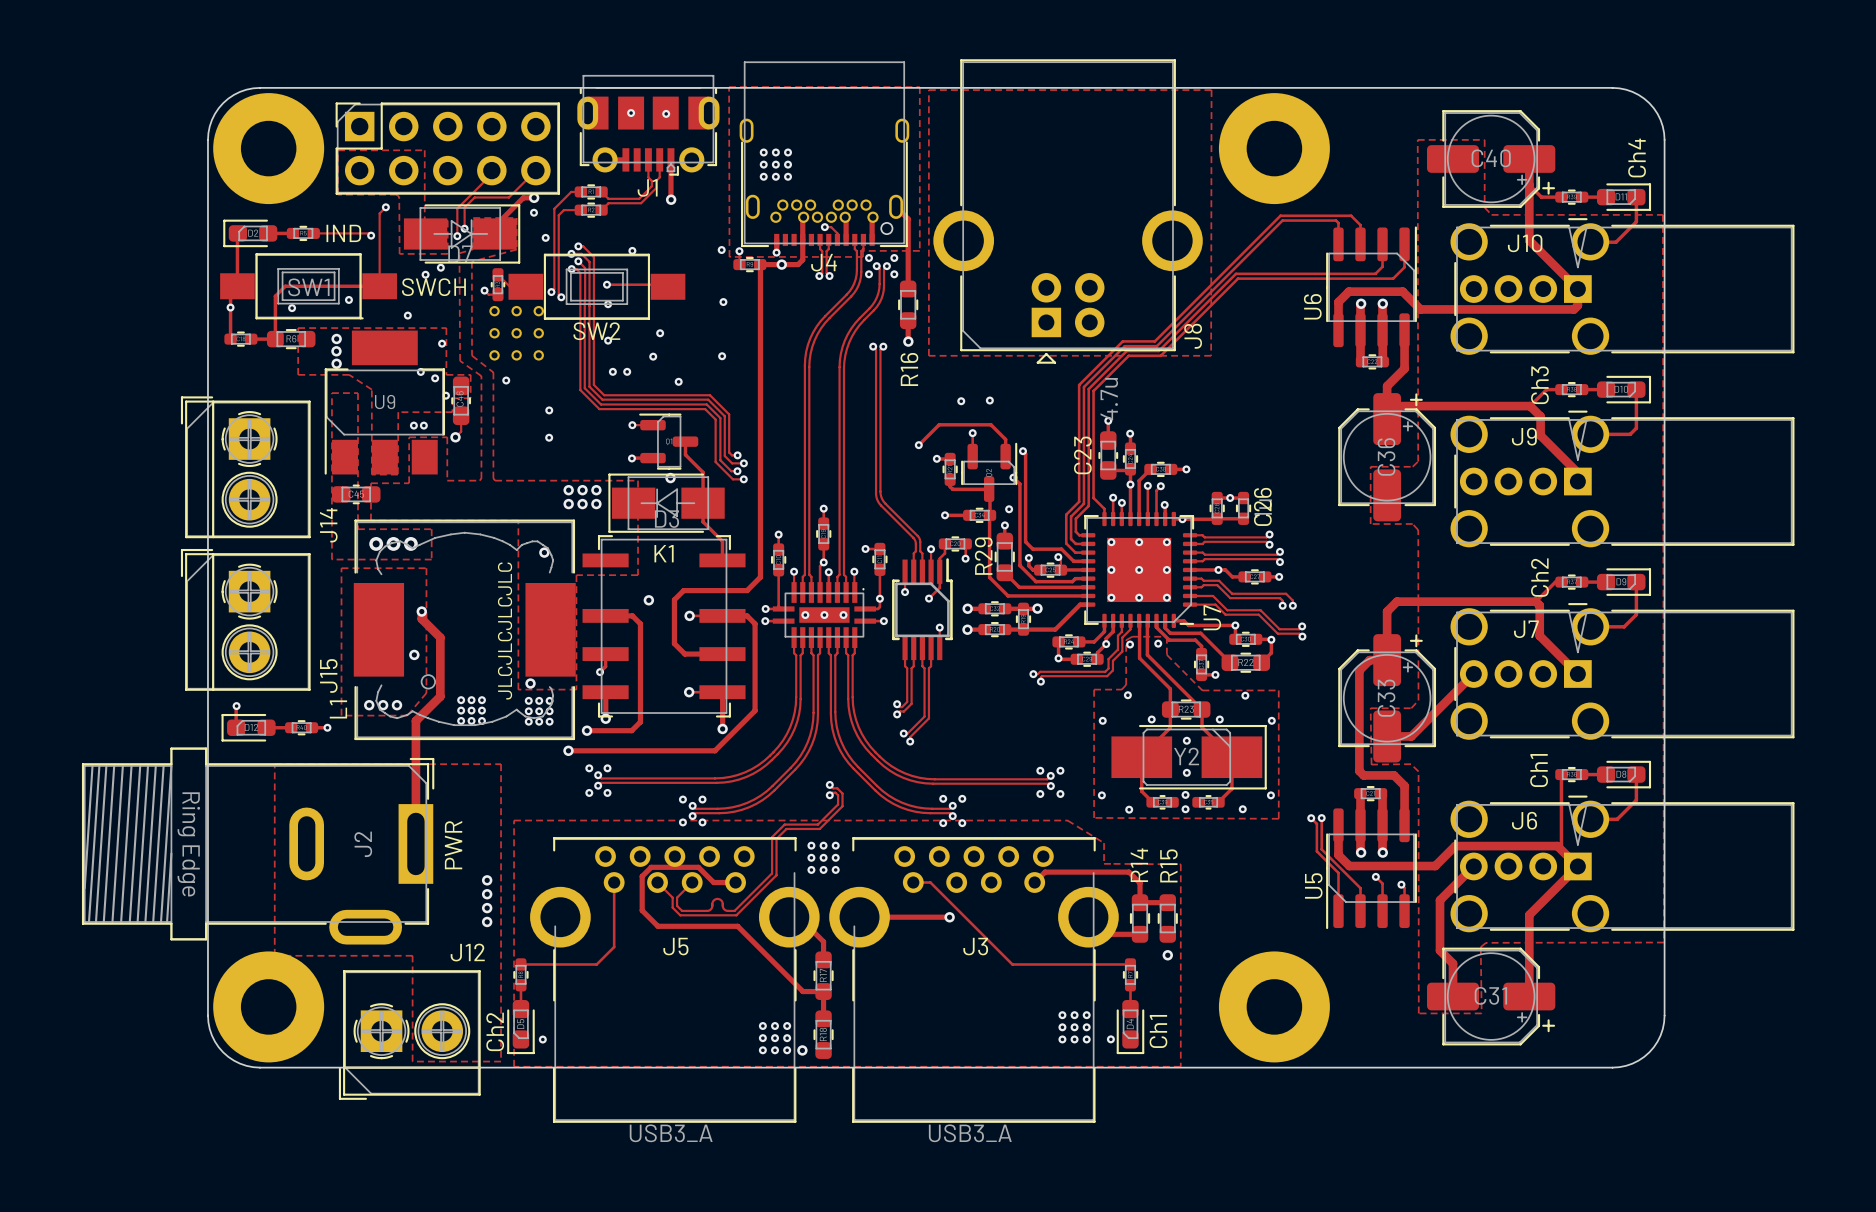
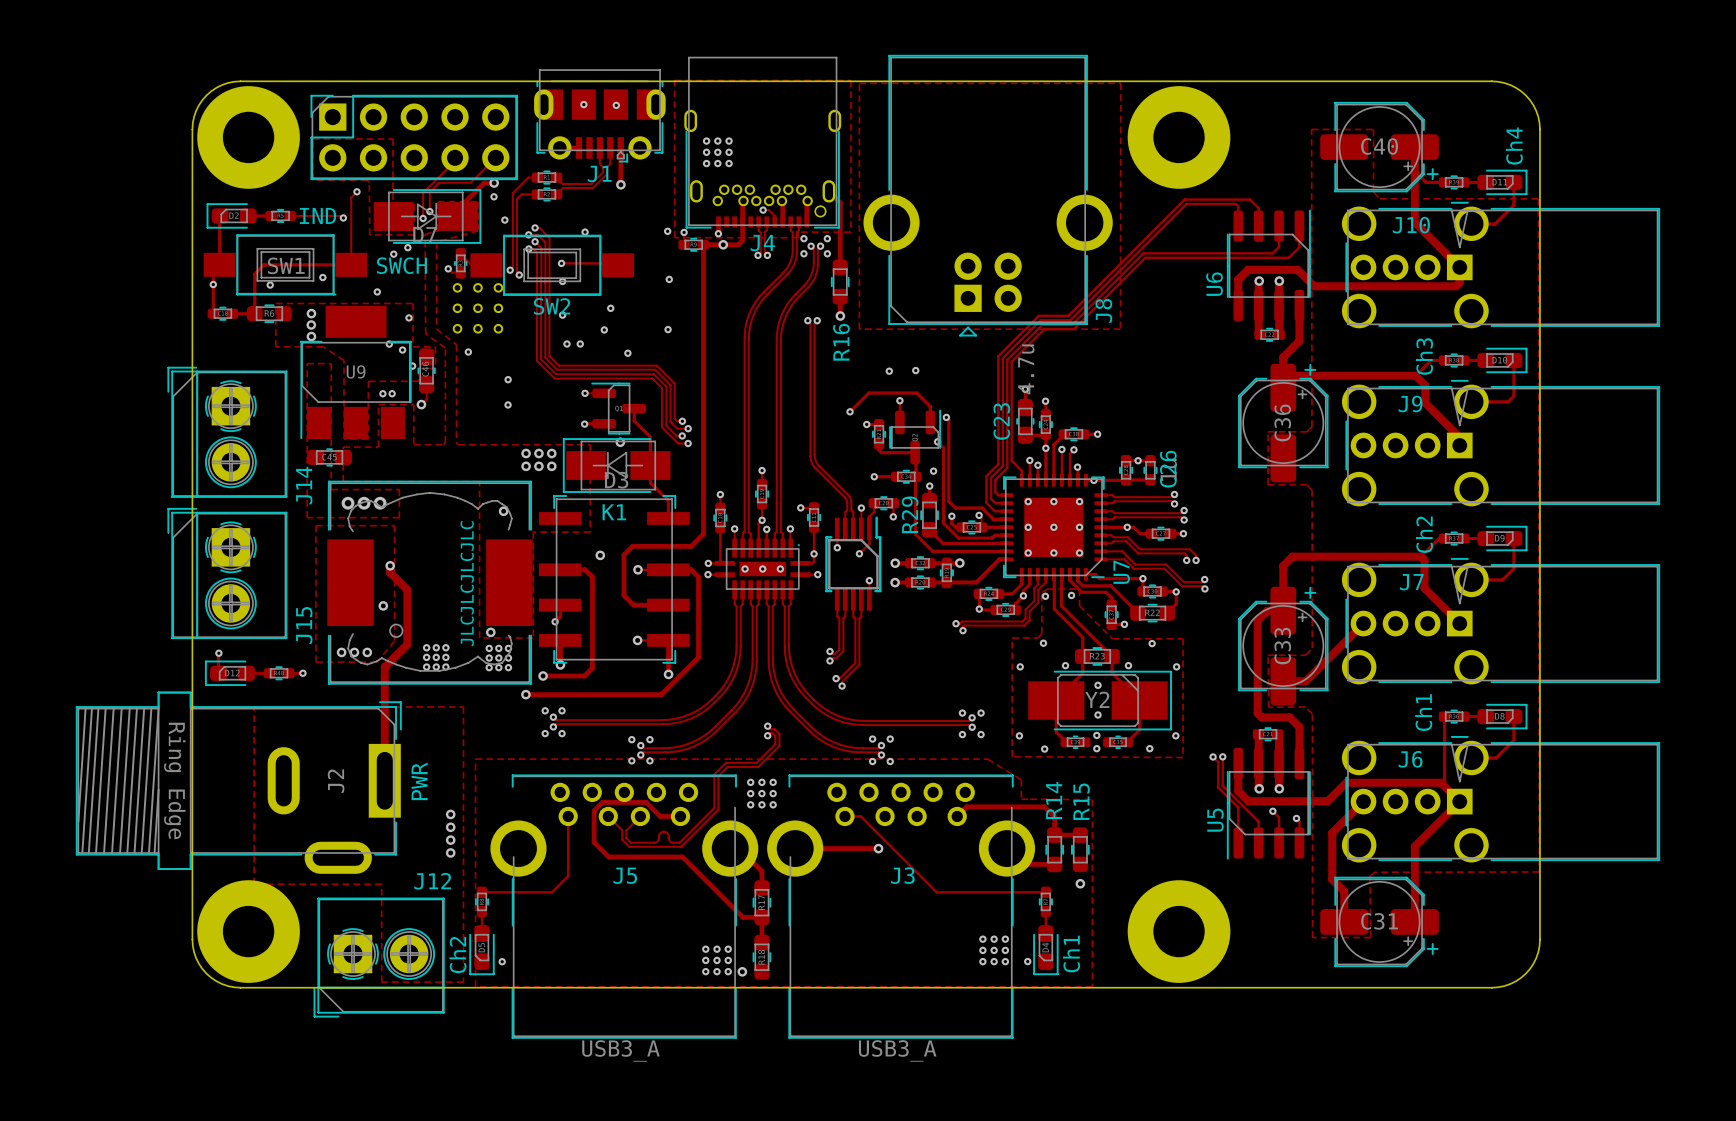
L1 name: L1 (338, 709) -> none

